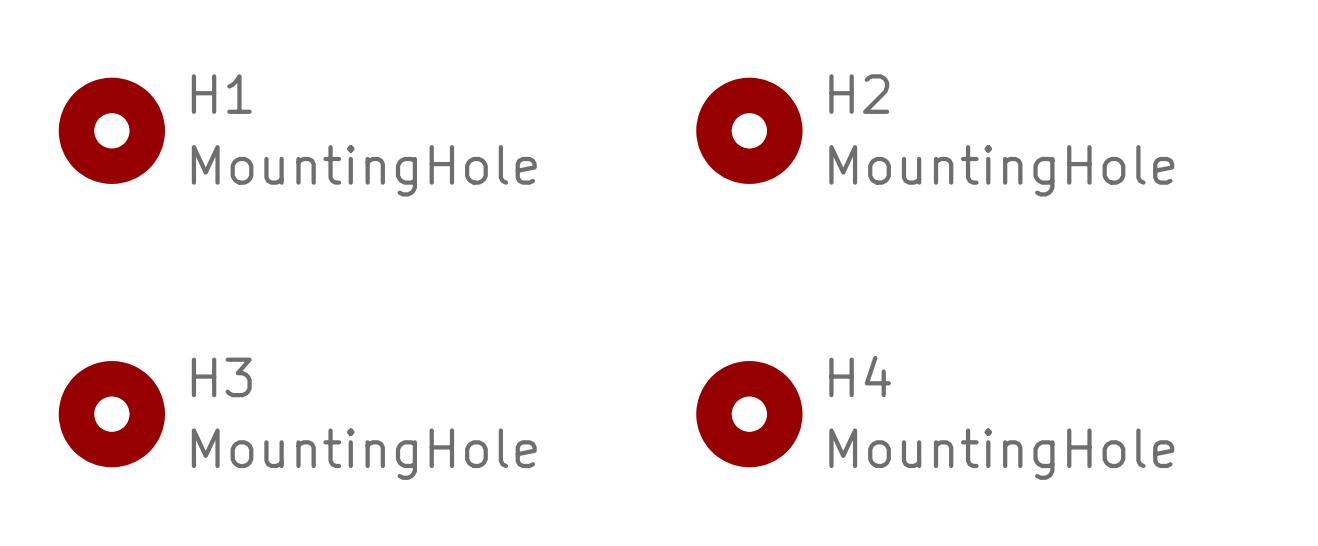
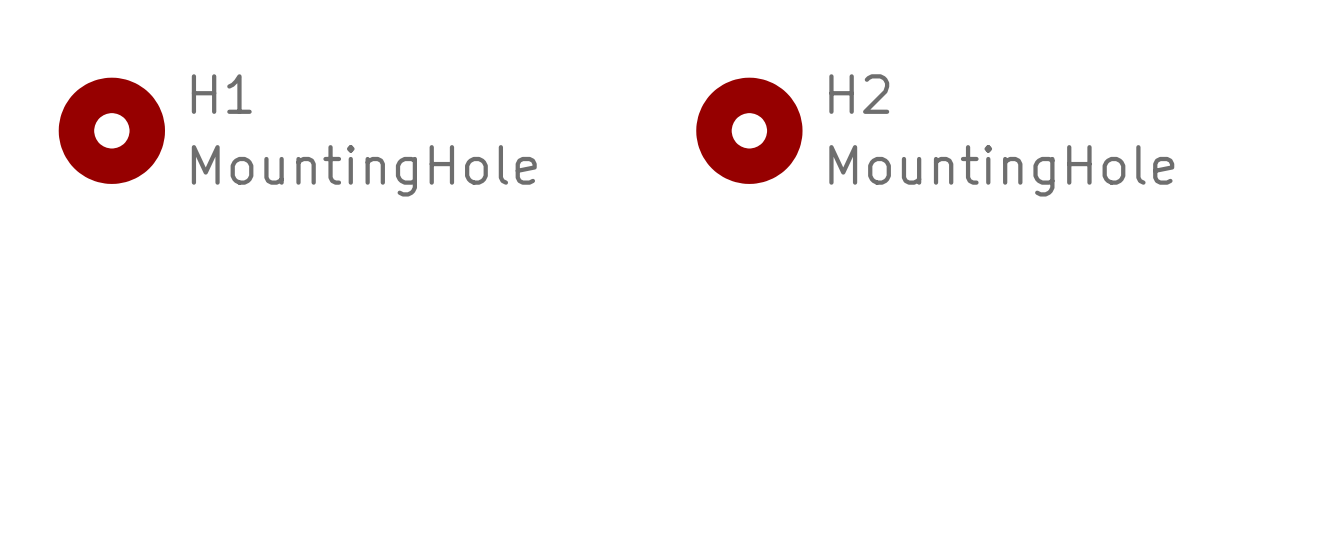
H3: MountingHole (111, 414) -> none
H4: MountingHole (749, 414) -> none

